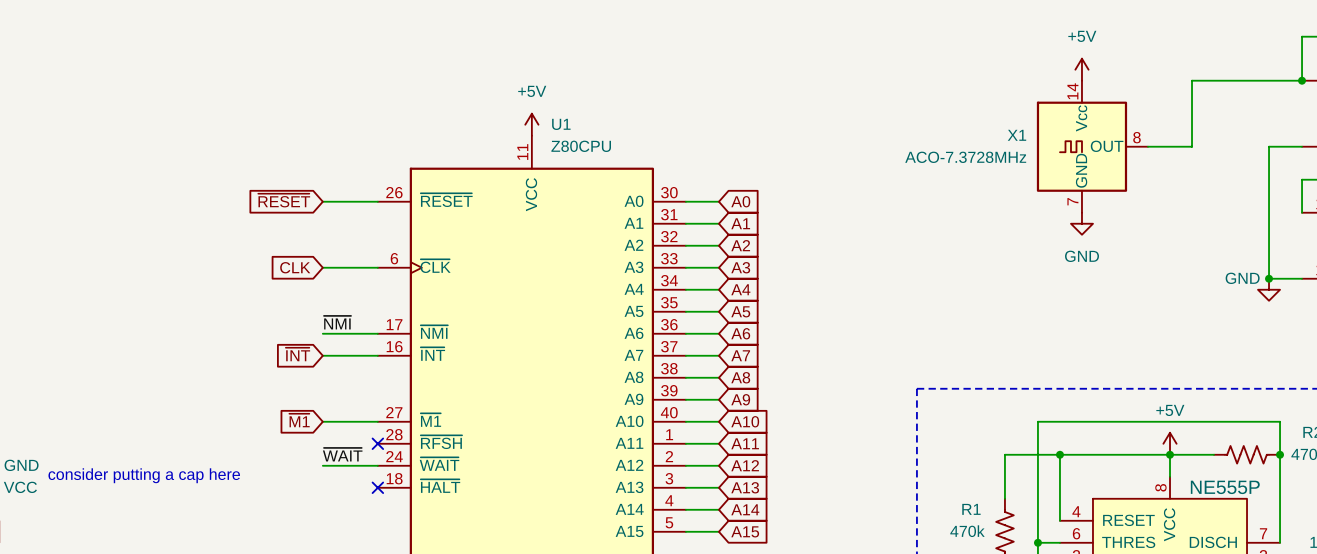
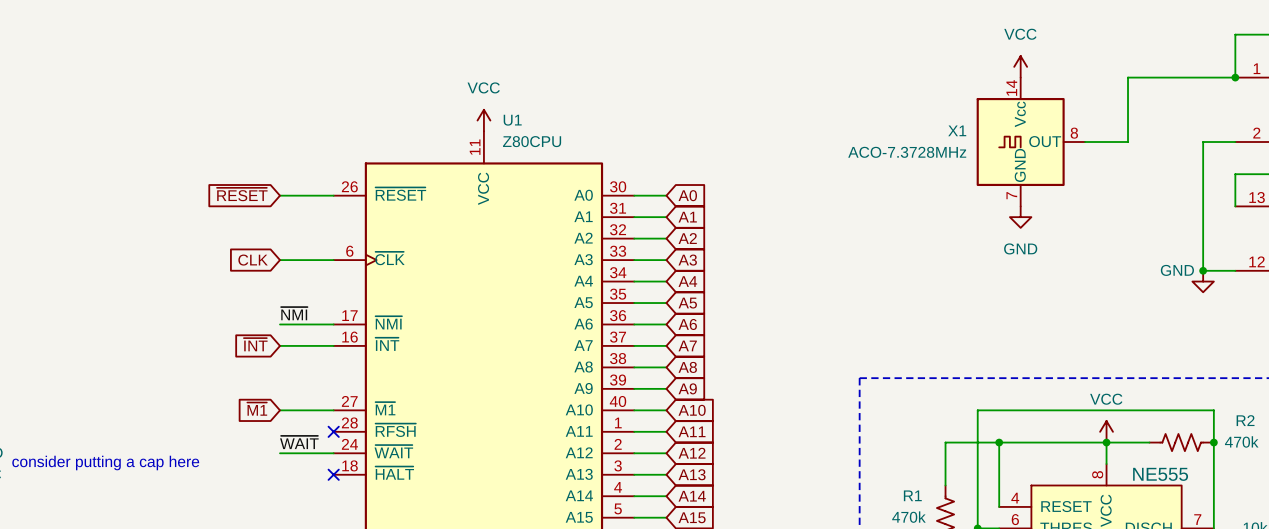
power symbol: +5V (1081, 69) -> VCC (1020, 66)
power symbol: +5V (531, 124) -> VCC (483, 120)
power symbol: +5V (1170, 443) -> VCC (1106, 431)
part value: NE555P (1225, 487) -> NE555 (1160, 474)

